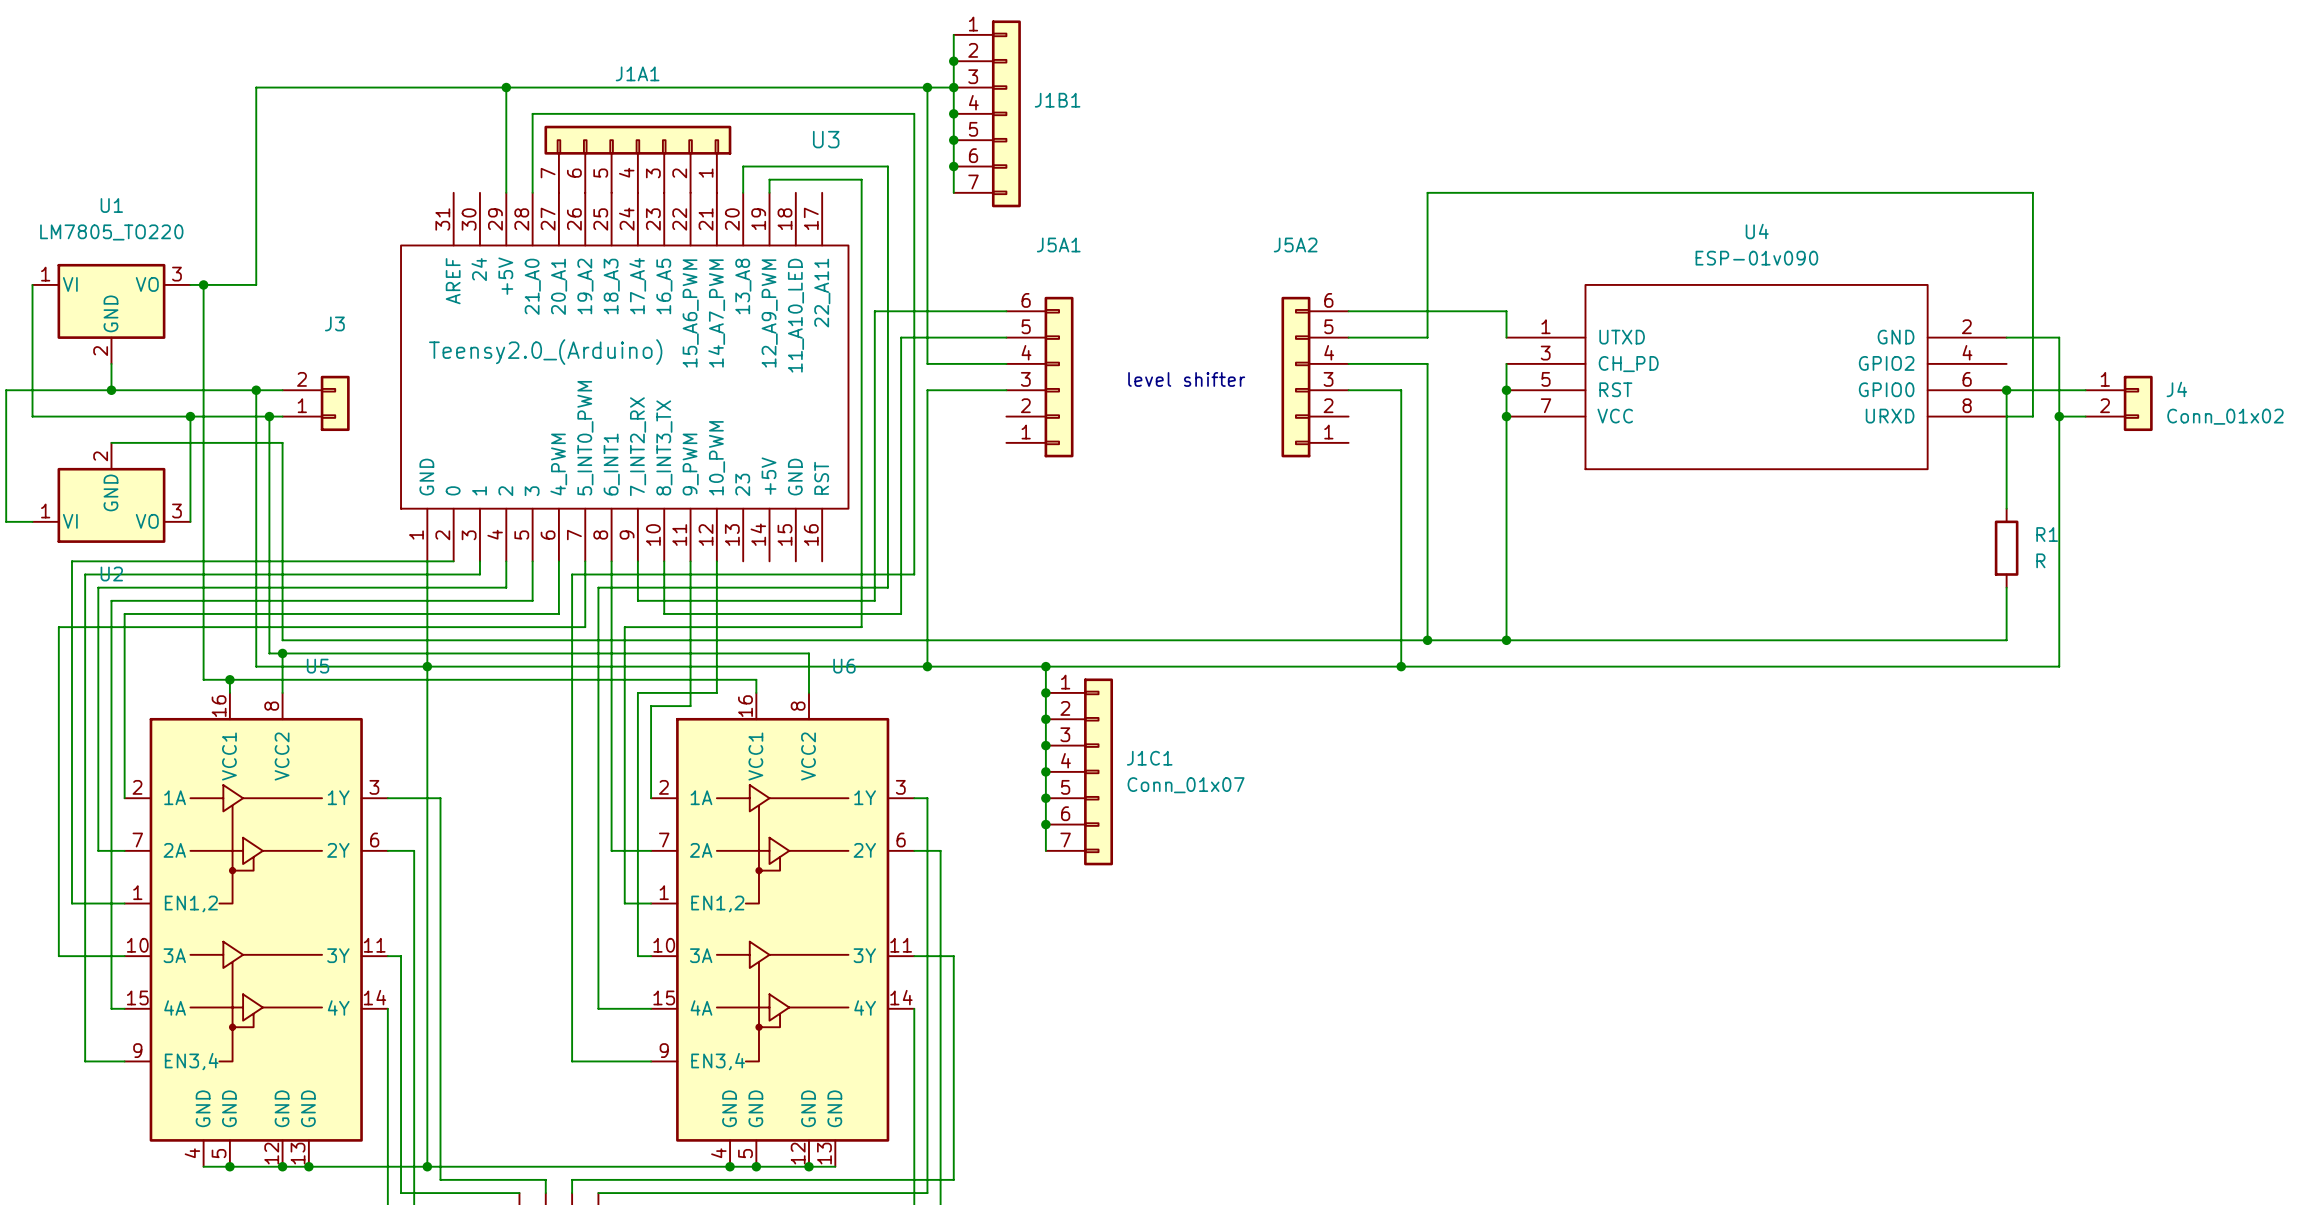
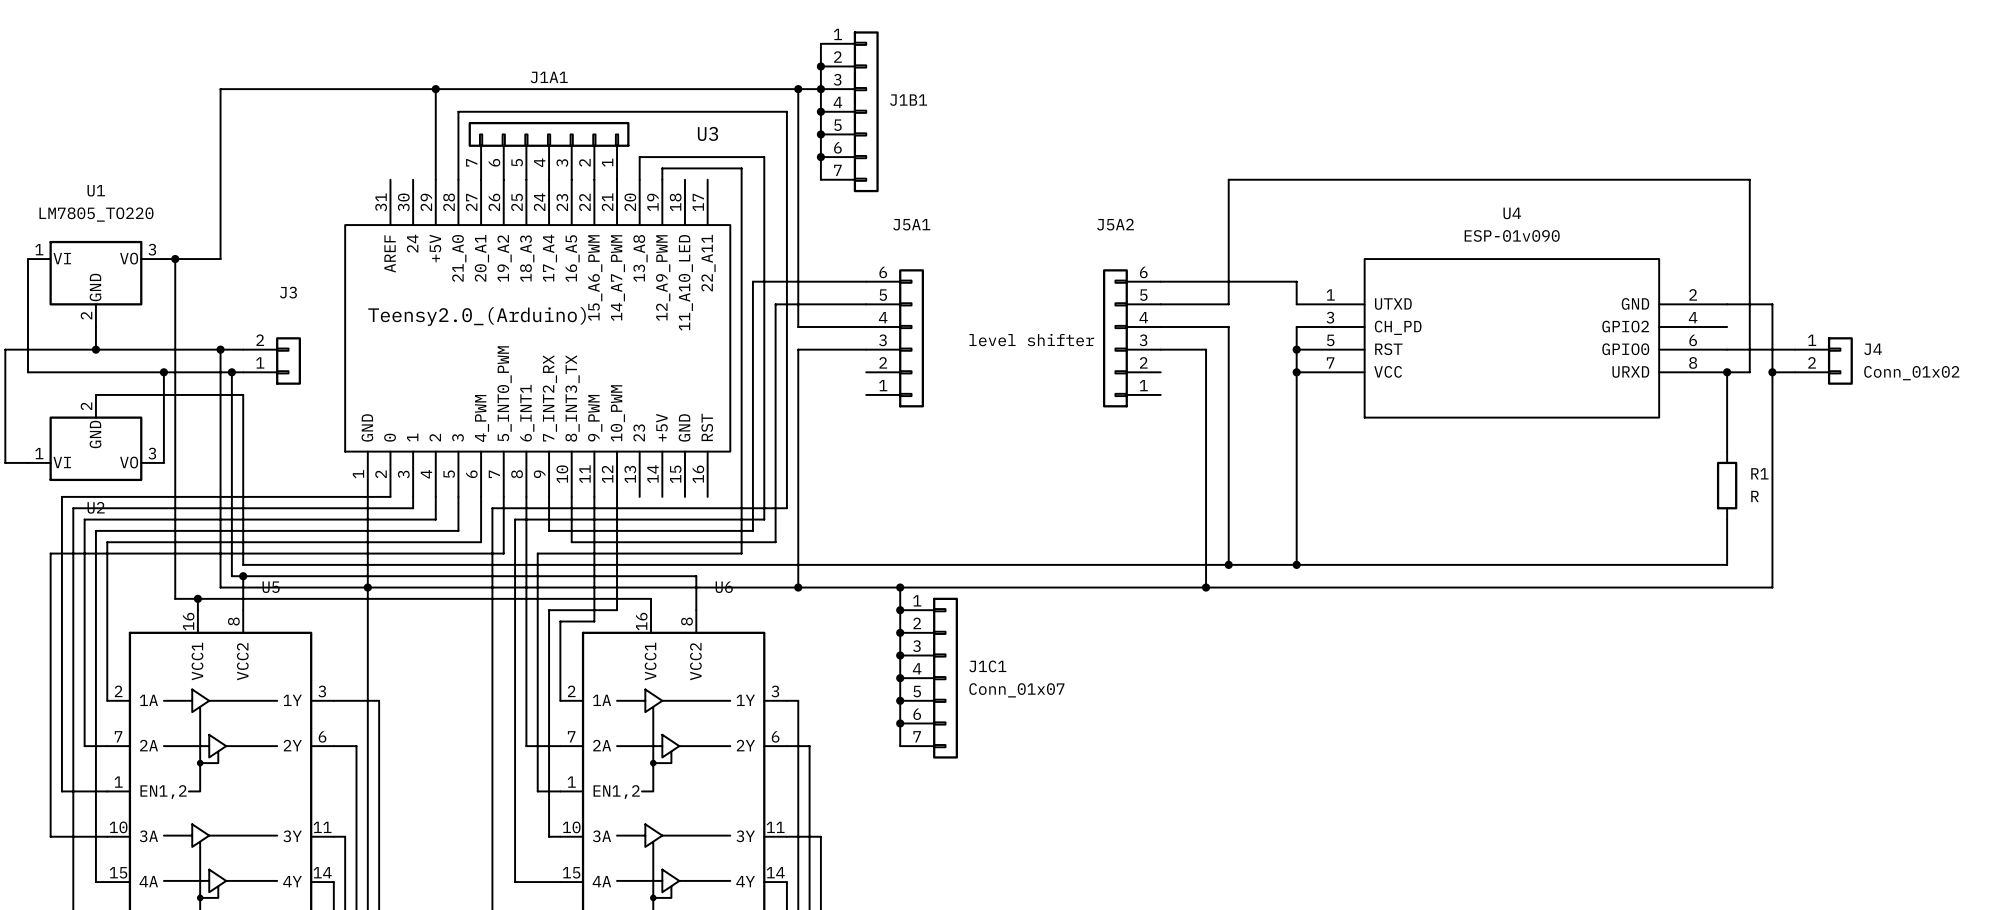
wire: (2006, 390) (2006, 416) -> none
junction position: (2006, 390) -> (1727, 372)

